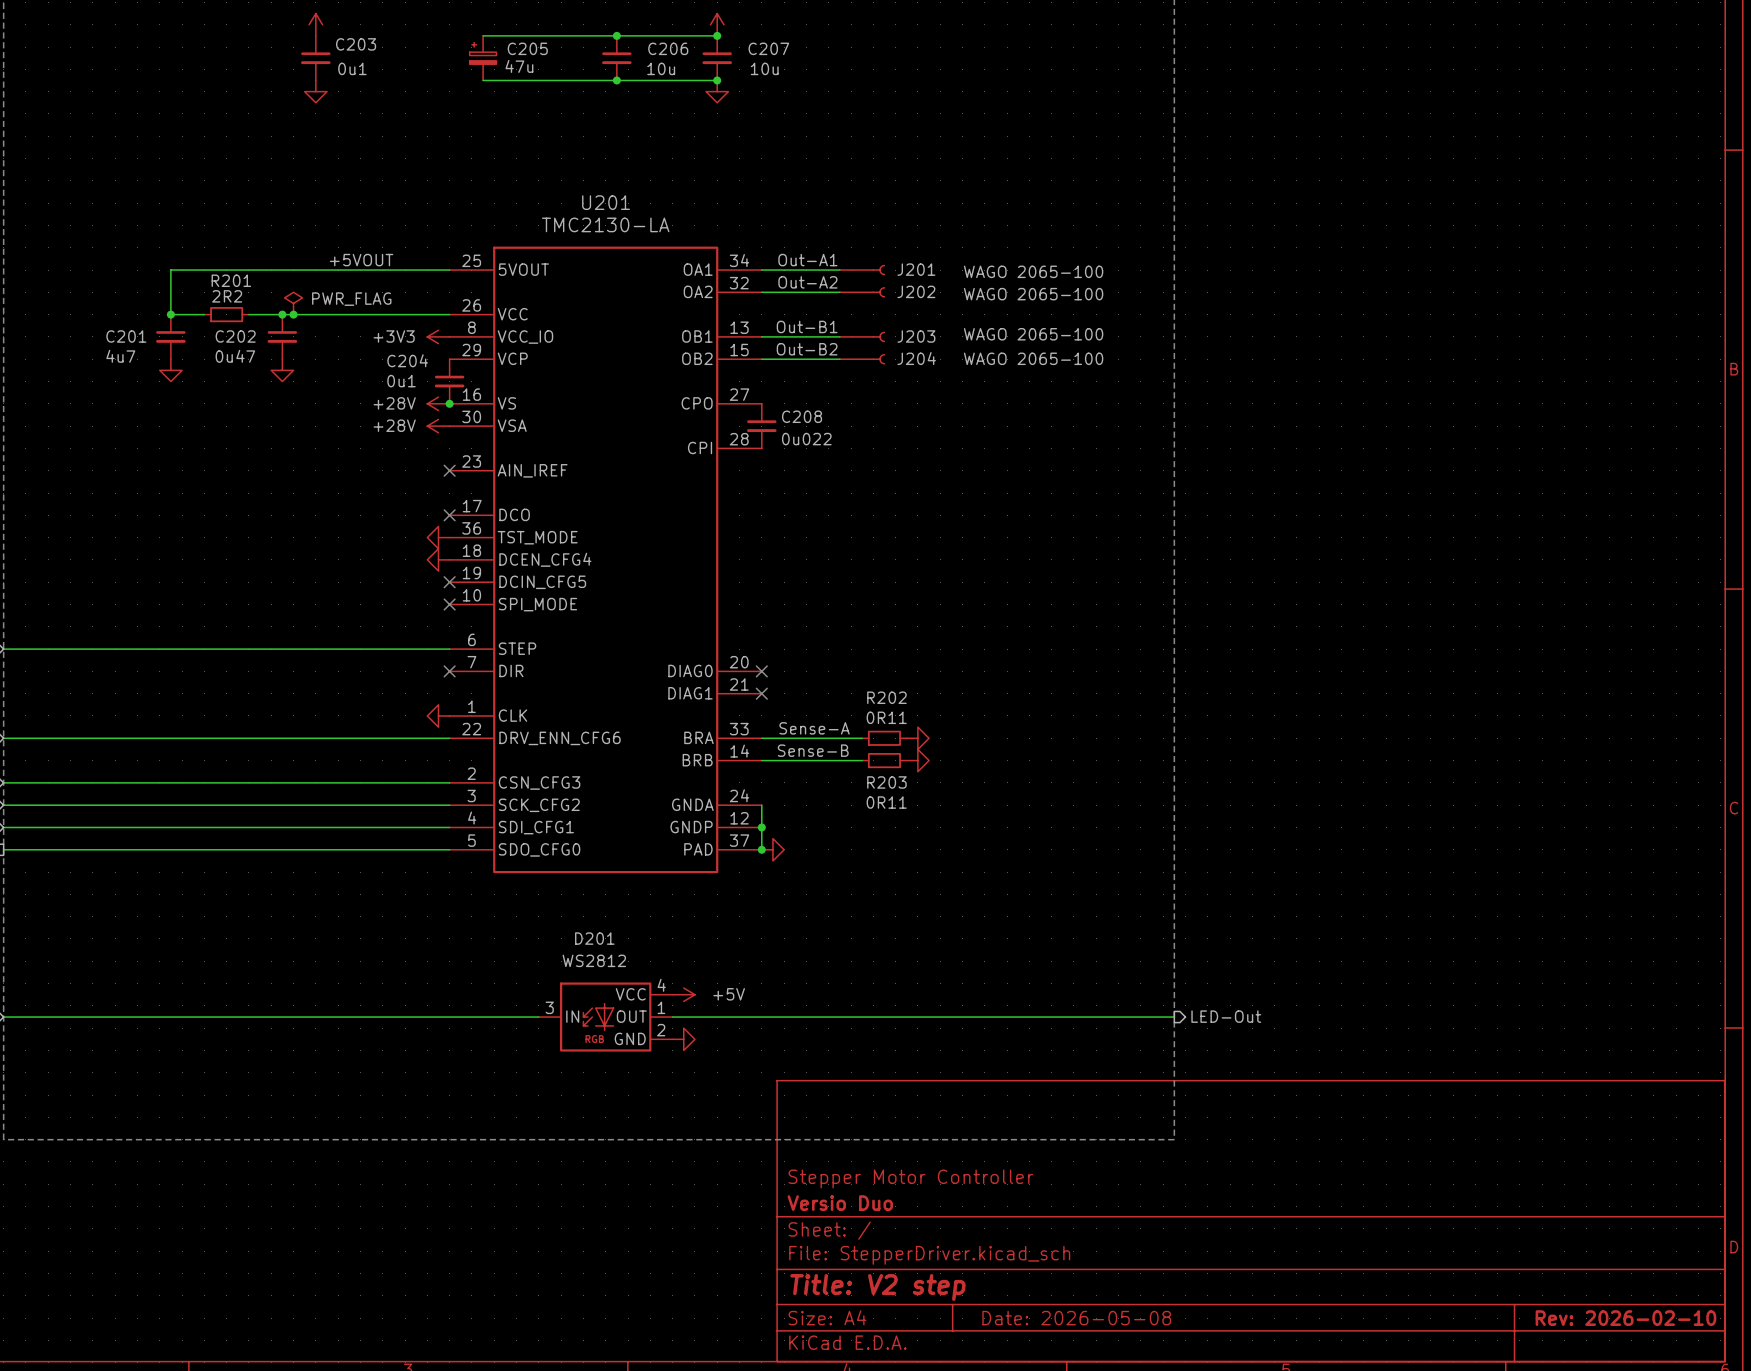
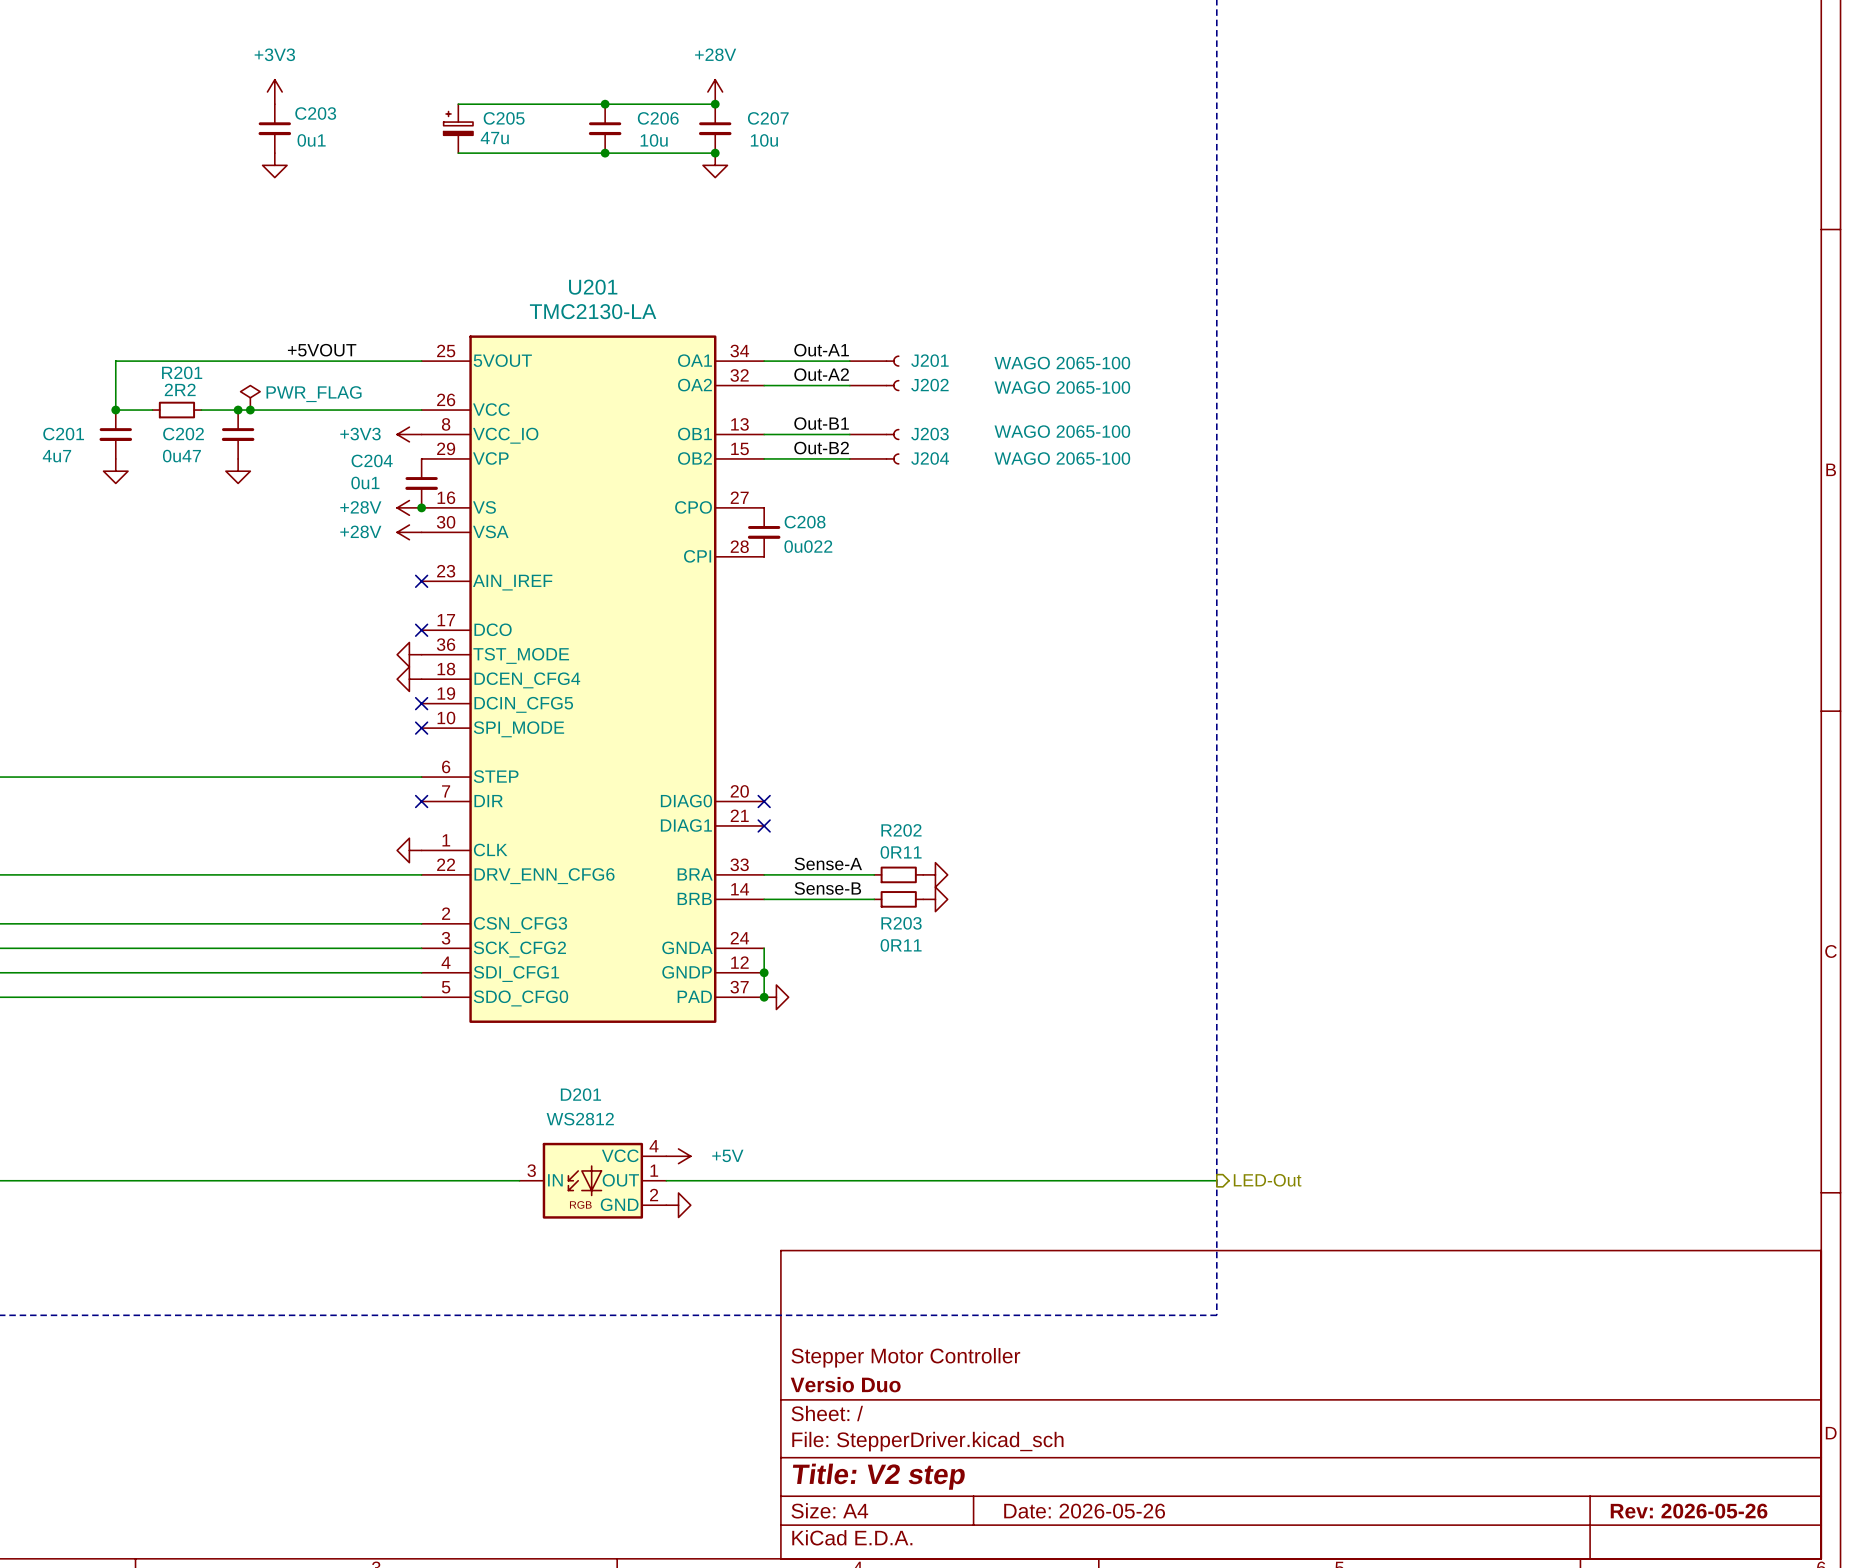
title block: Date: 2026-05-08 (1076, 1318) -> Date: 2026-05-26 (1084, 1511)
title block: Rev: 2026-02-10 (1625, 1318) -> Rev: 2026-05-26 (1689, 1511)

